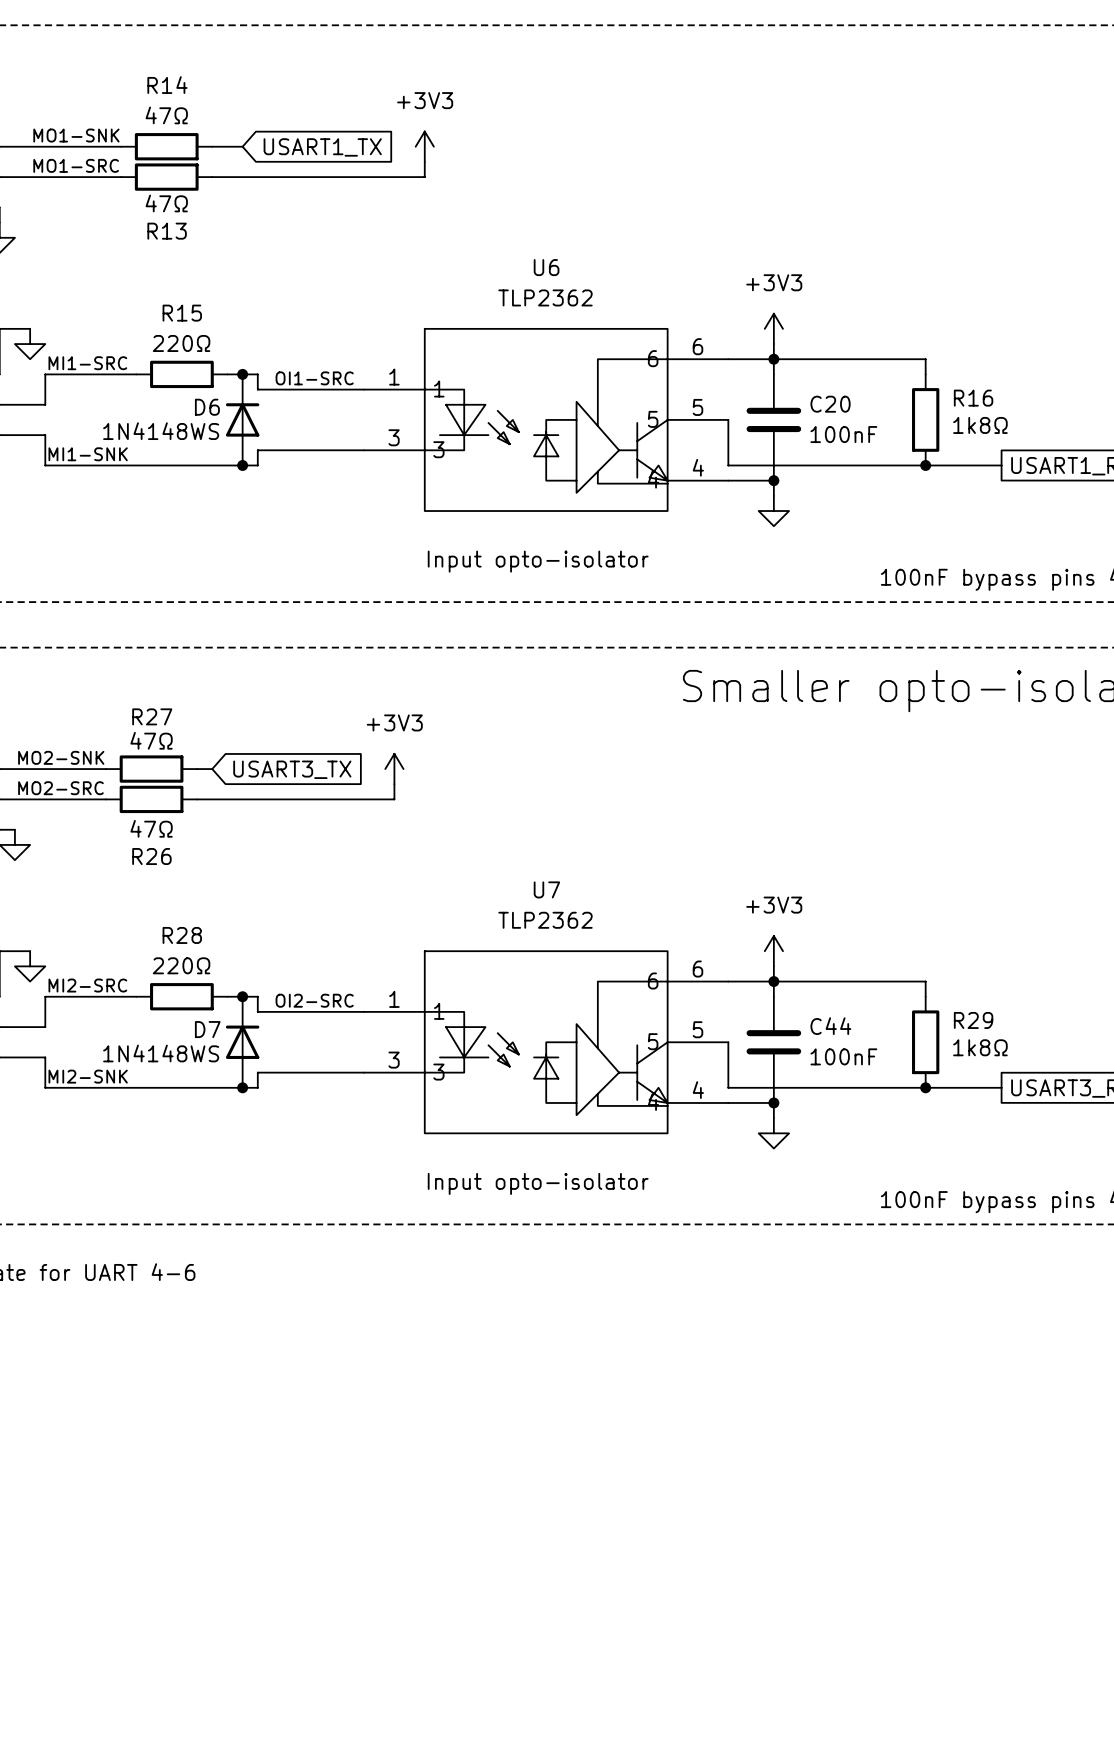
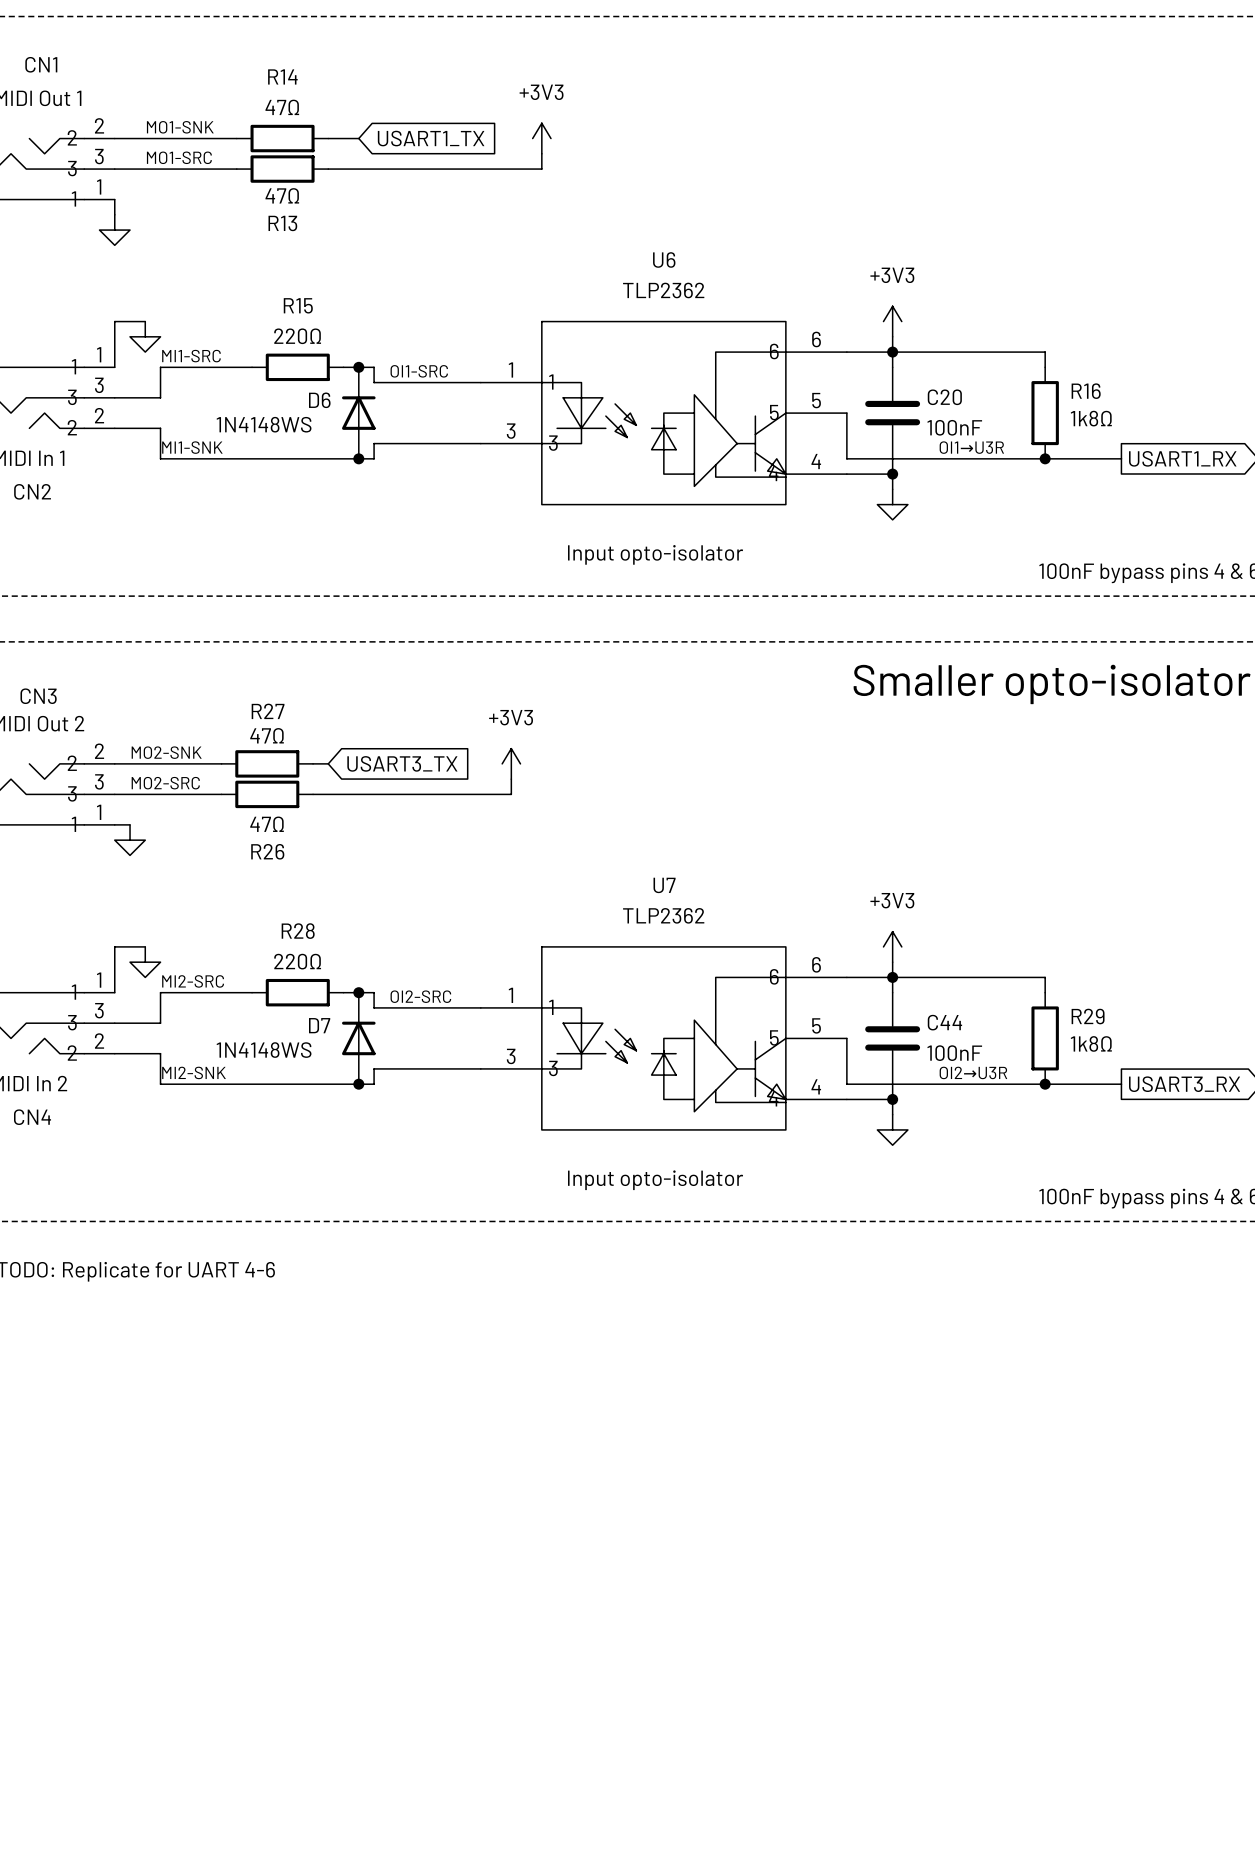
label: none -> OI1→U3R (971, 447)
label: none -> OI2→U3R (973, 1072)

